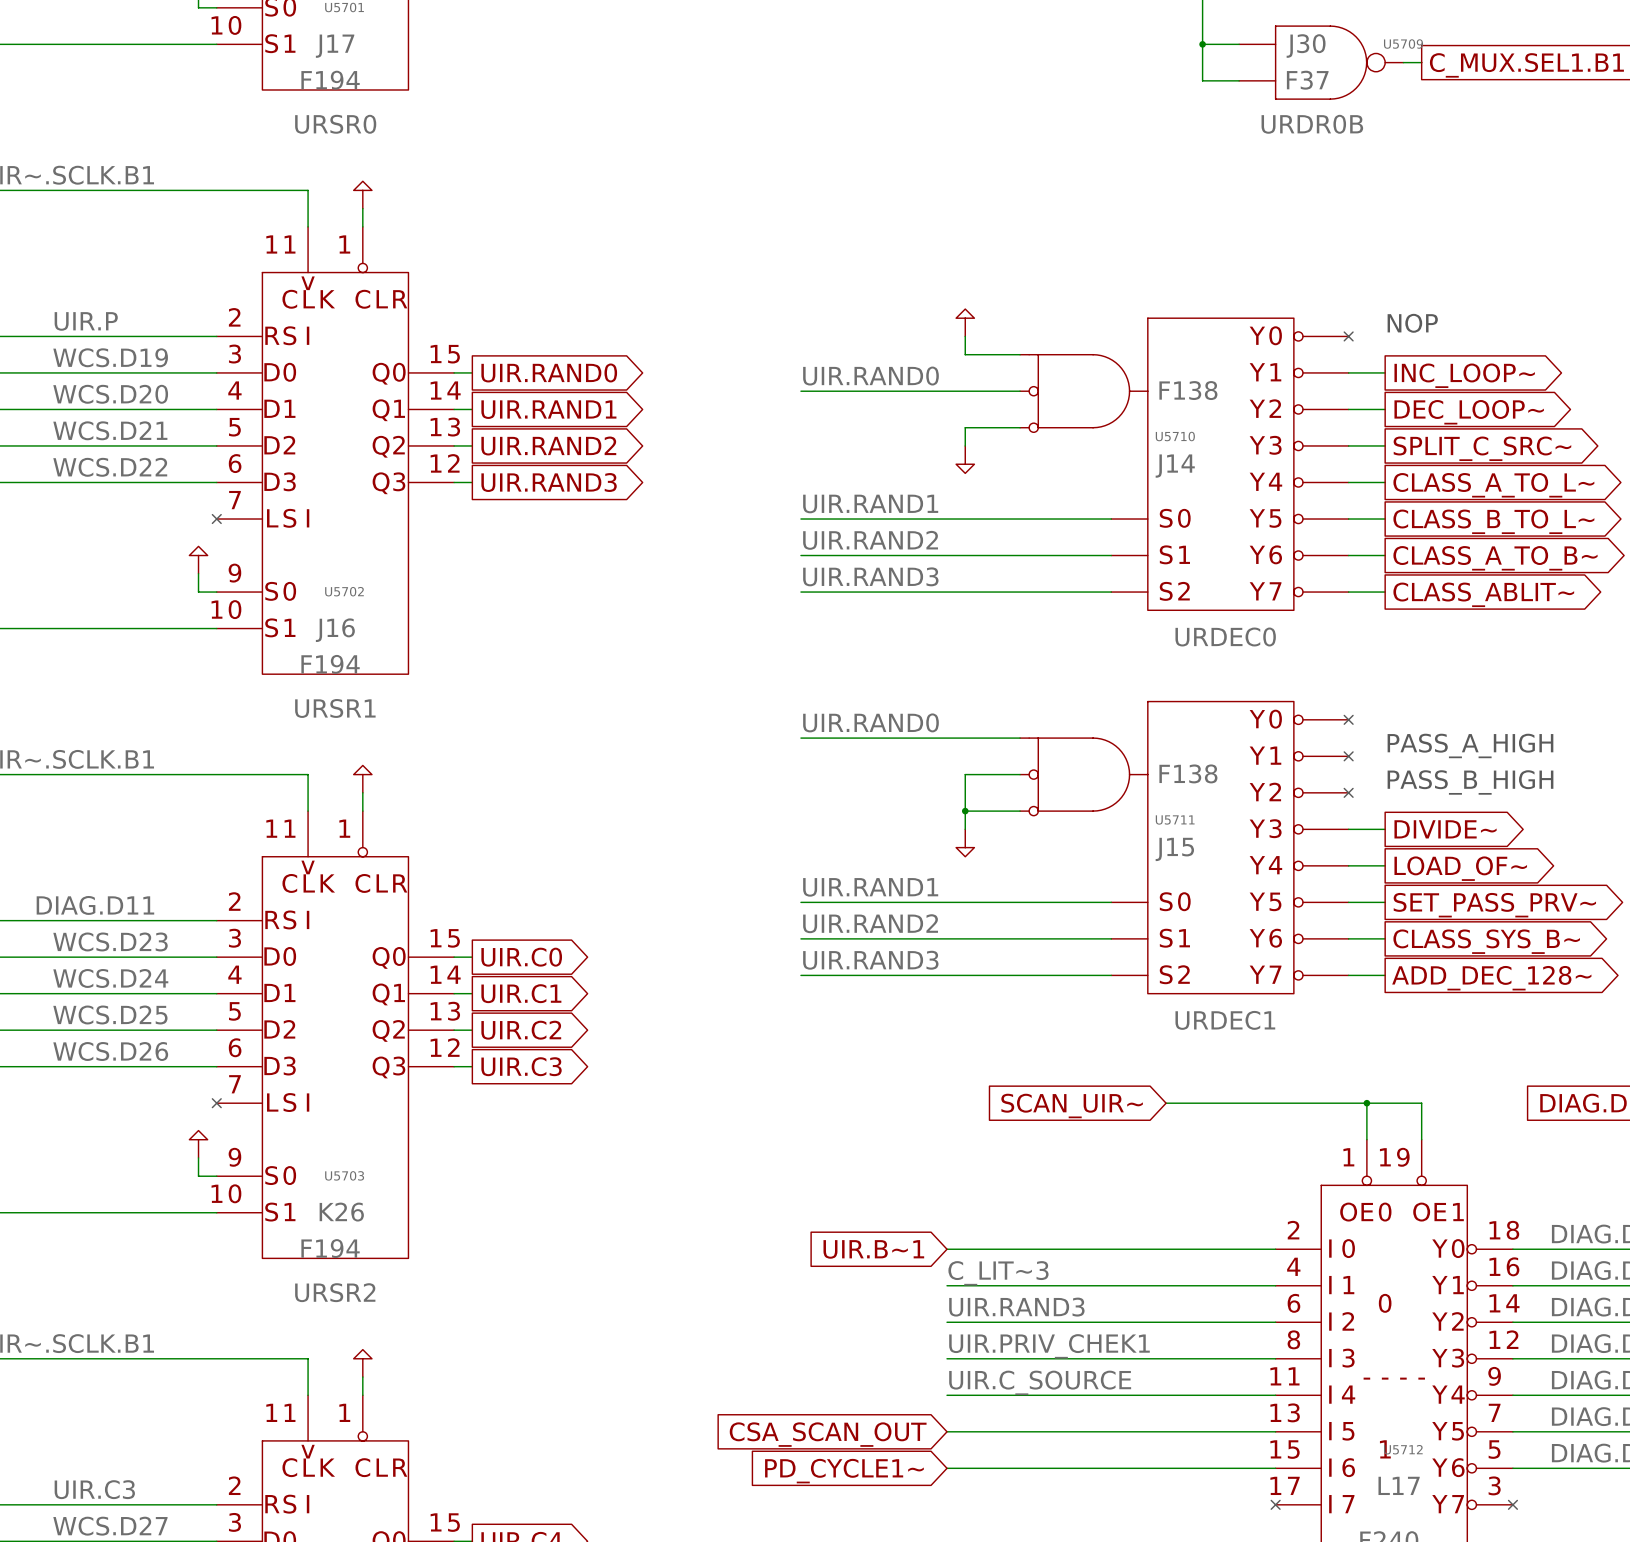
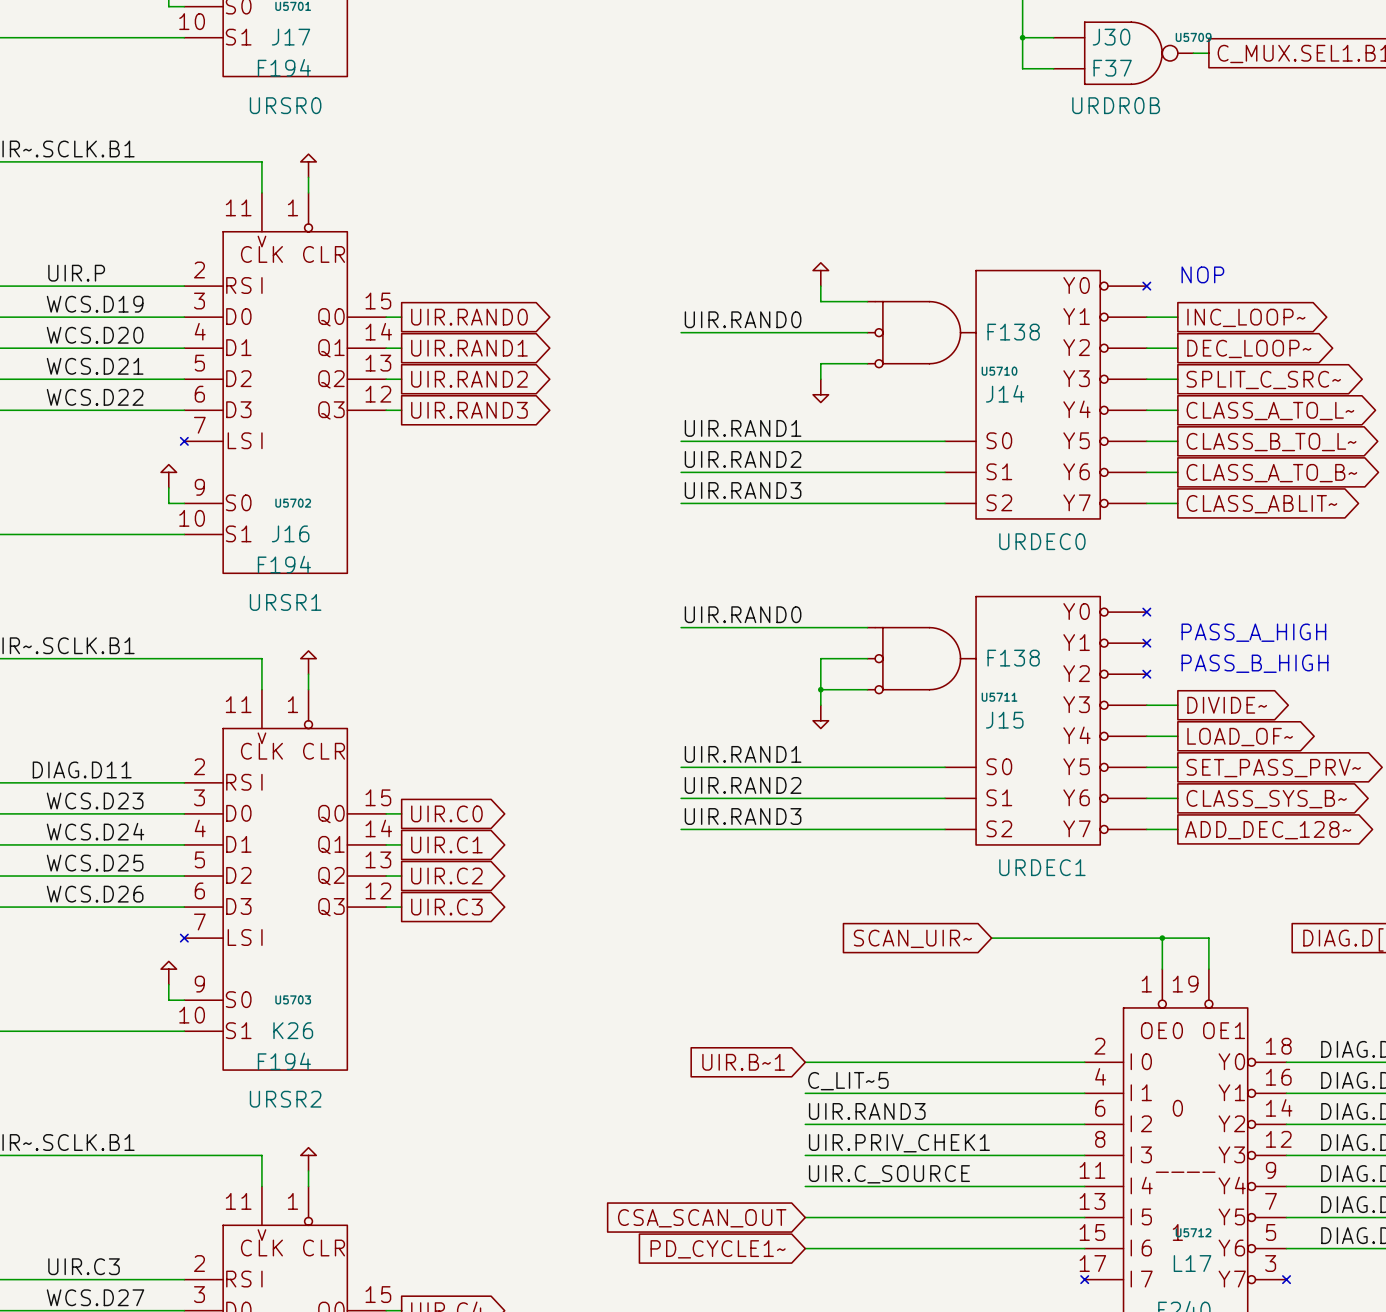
label: C_LIT~3 (998, 1273) -> C_LIT~5 (848, 1081)

